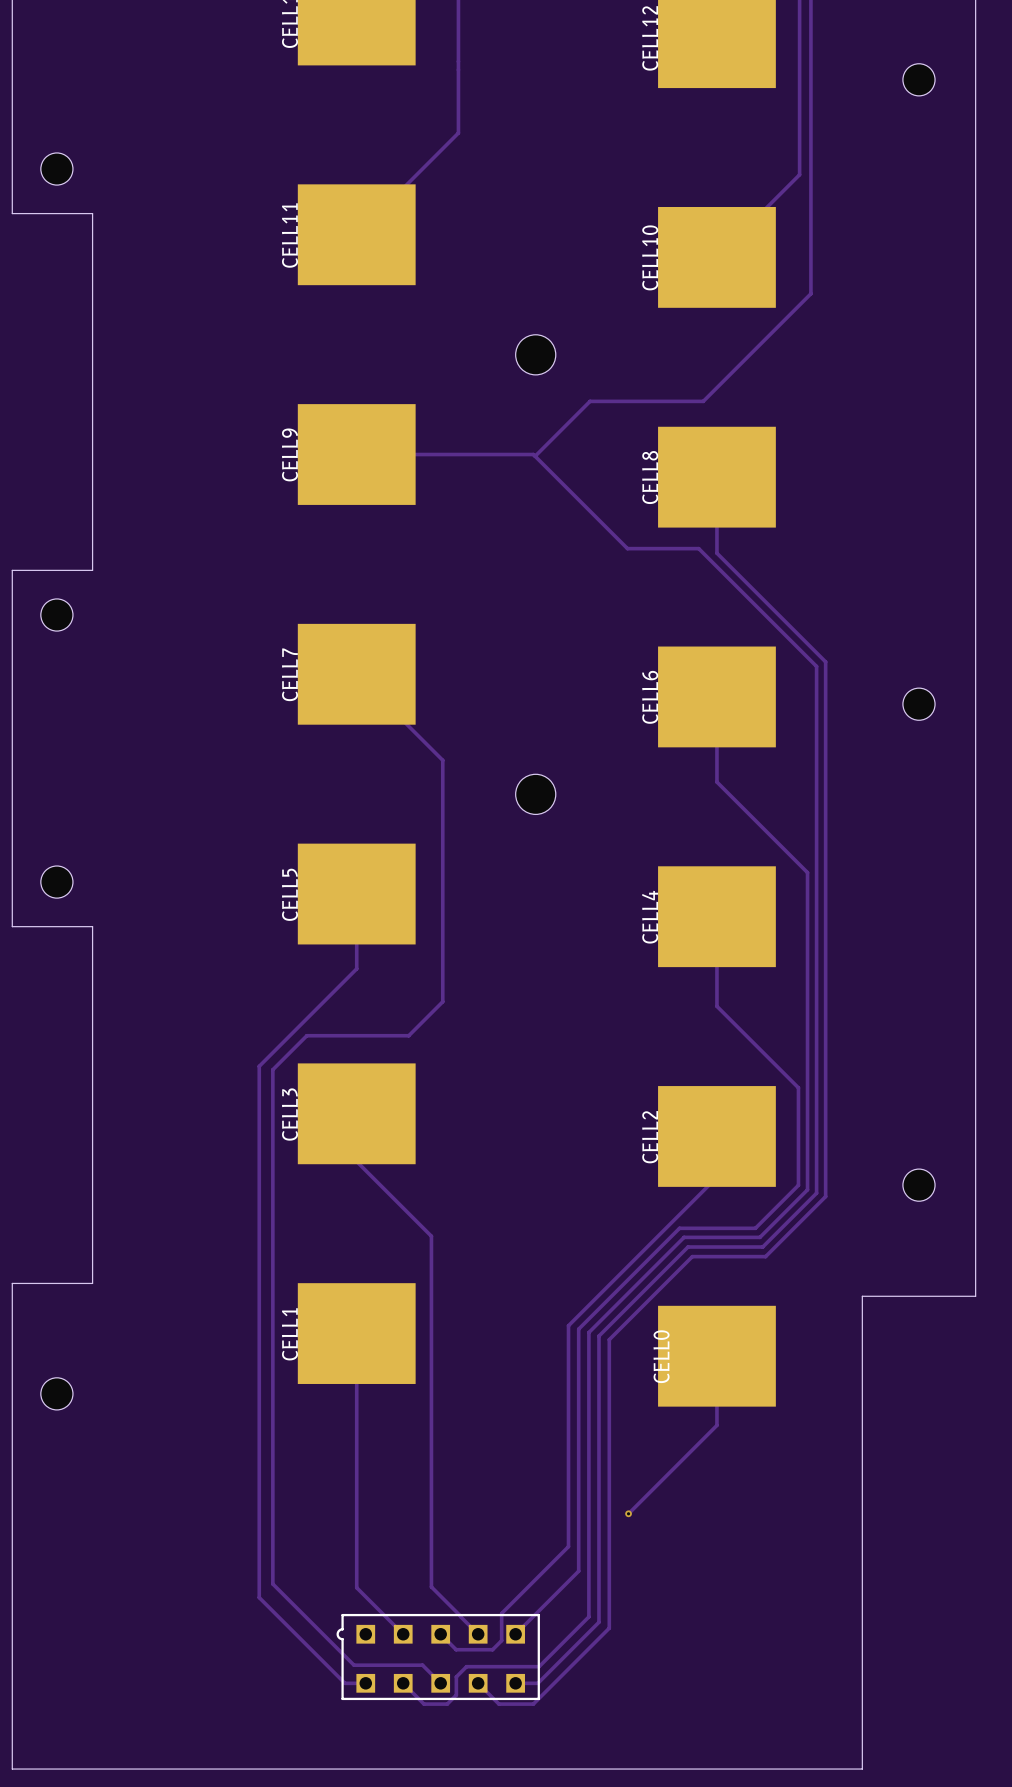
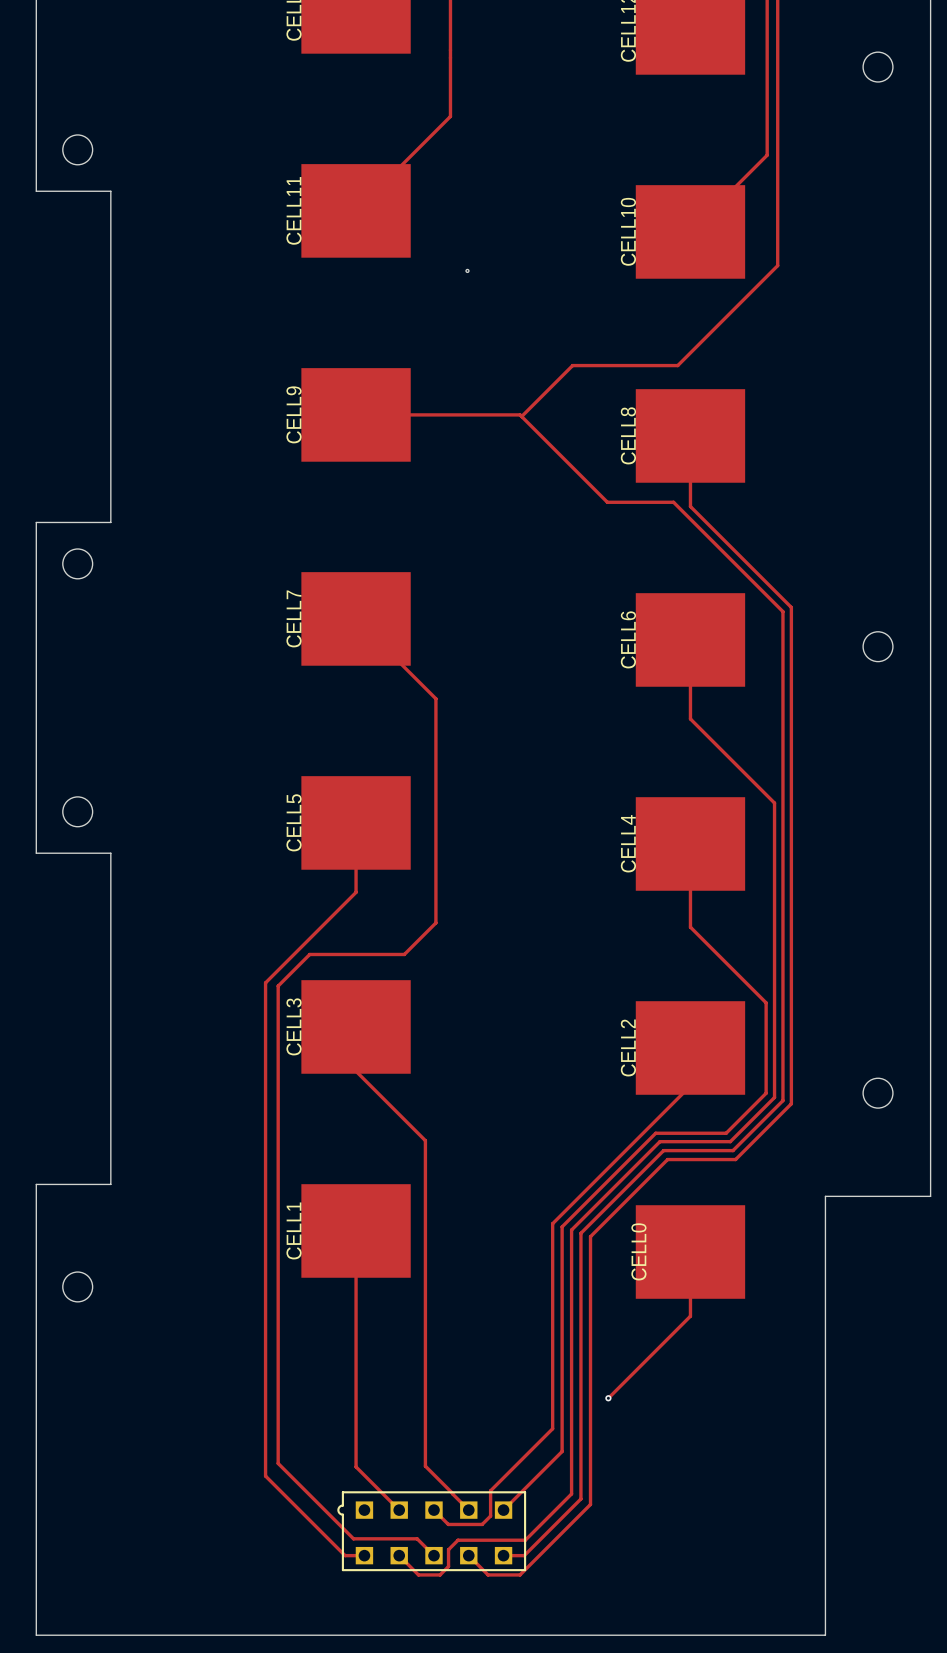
hole: none -> (467, 270)
hole: (535, 354) -> none
hole: (535, 794) -> none

